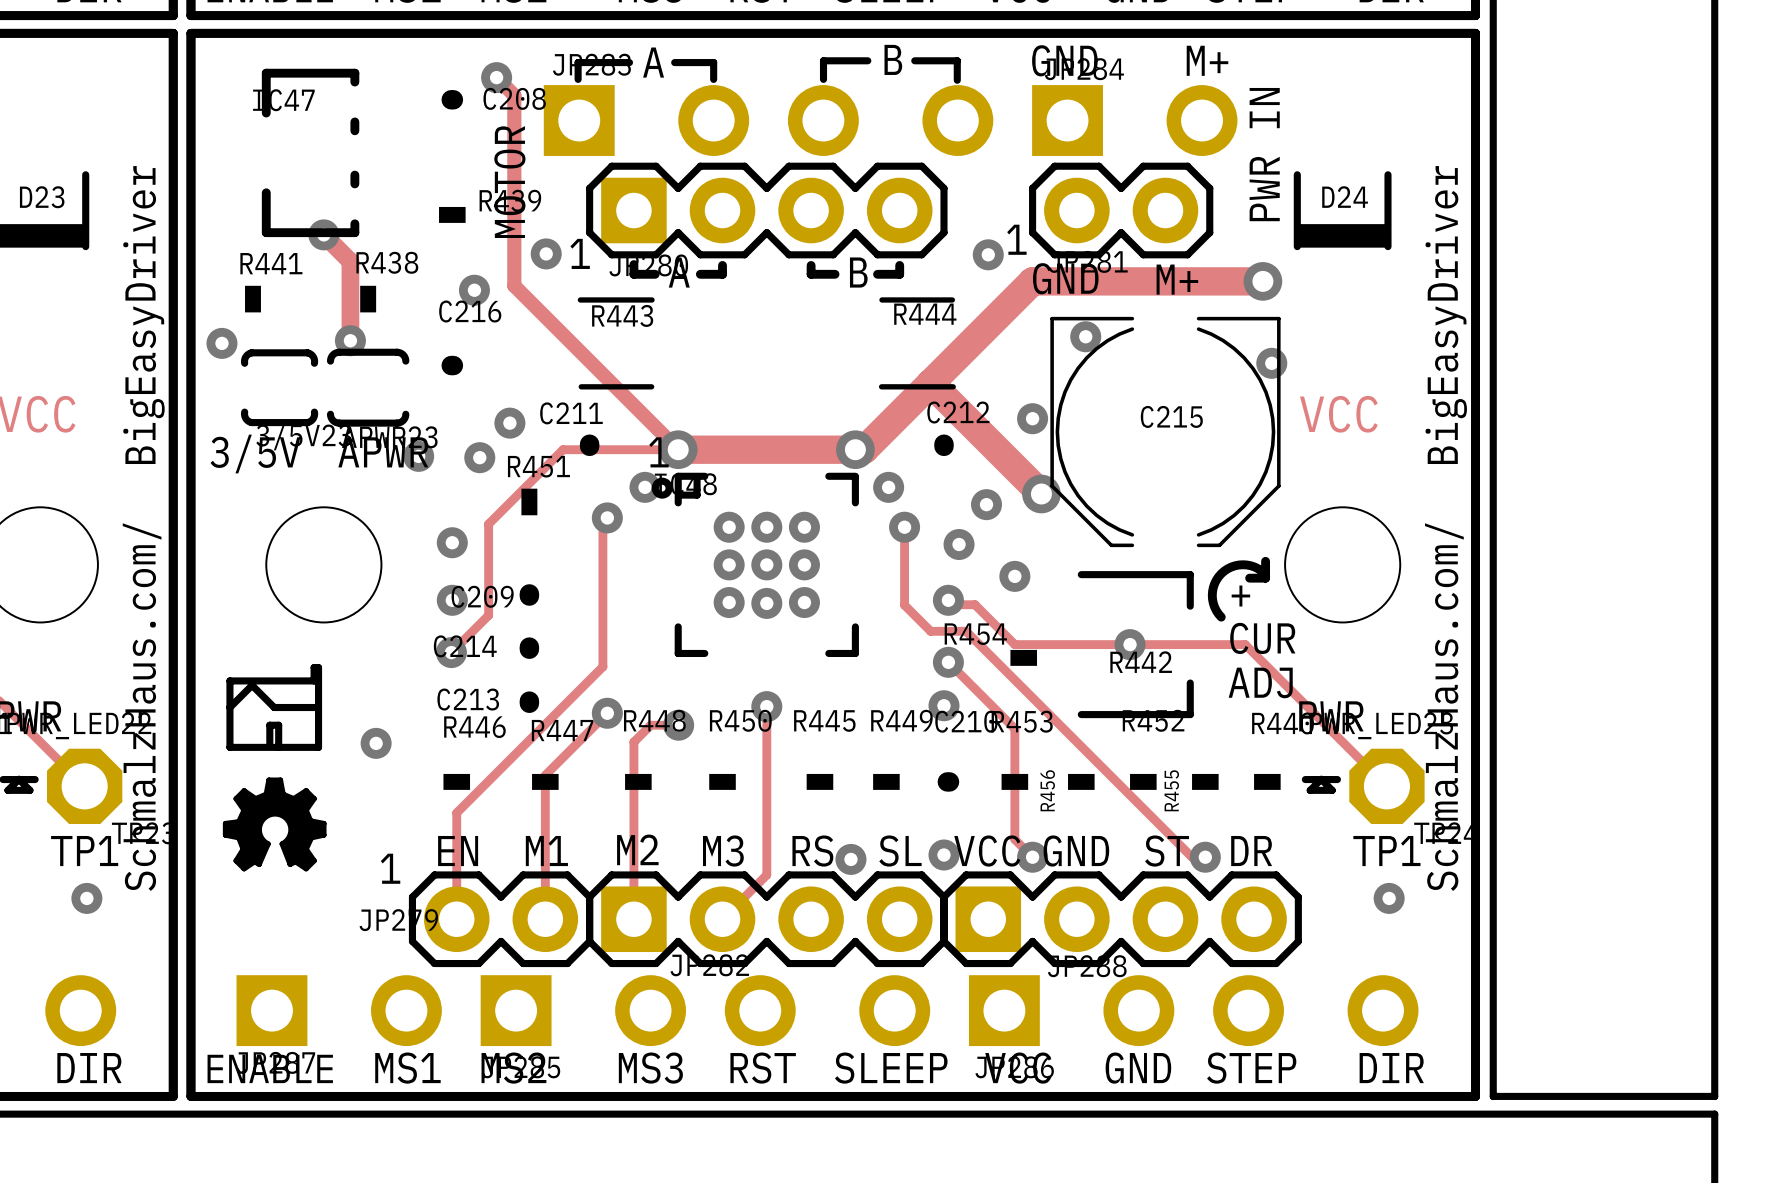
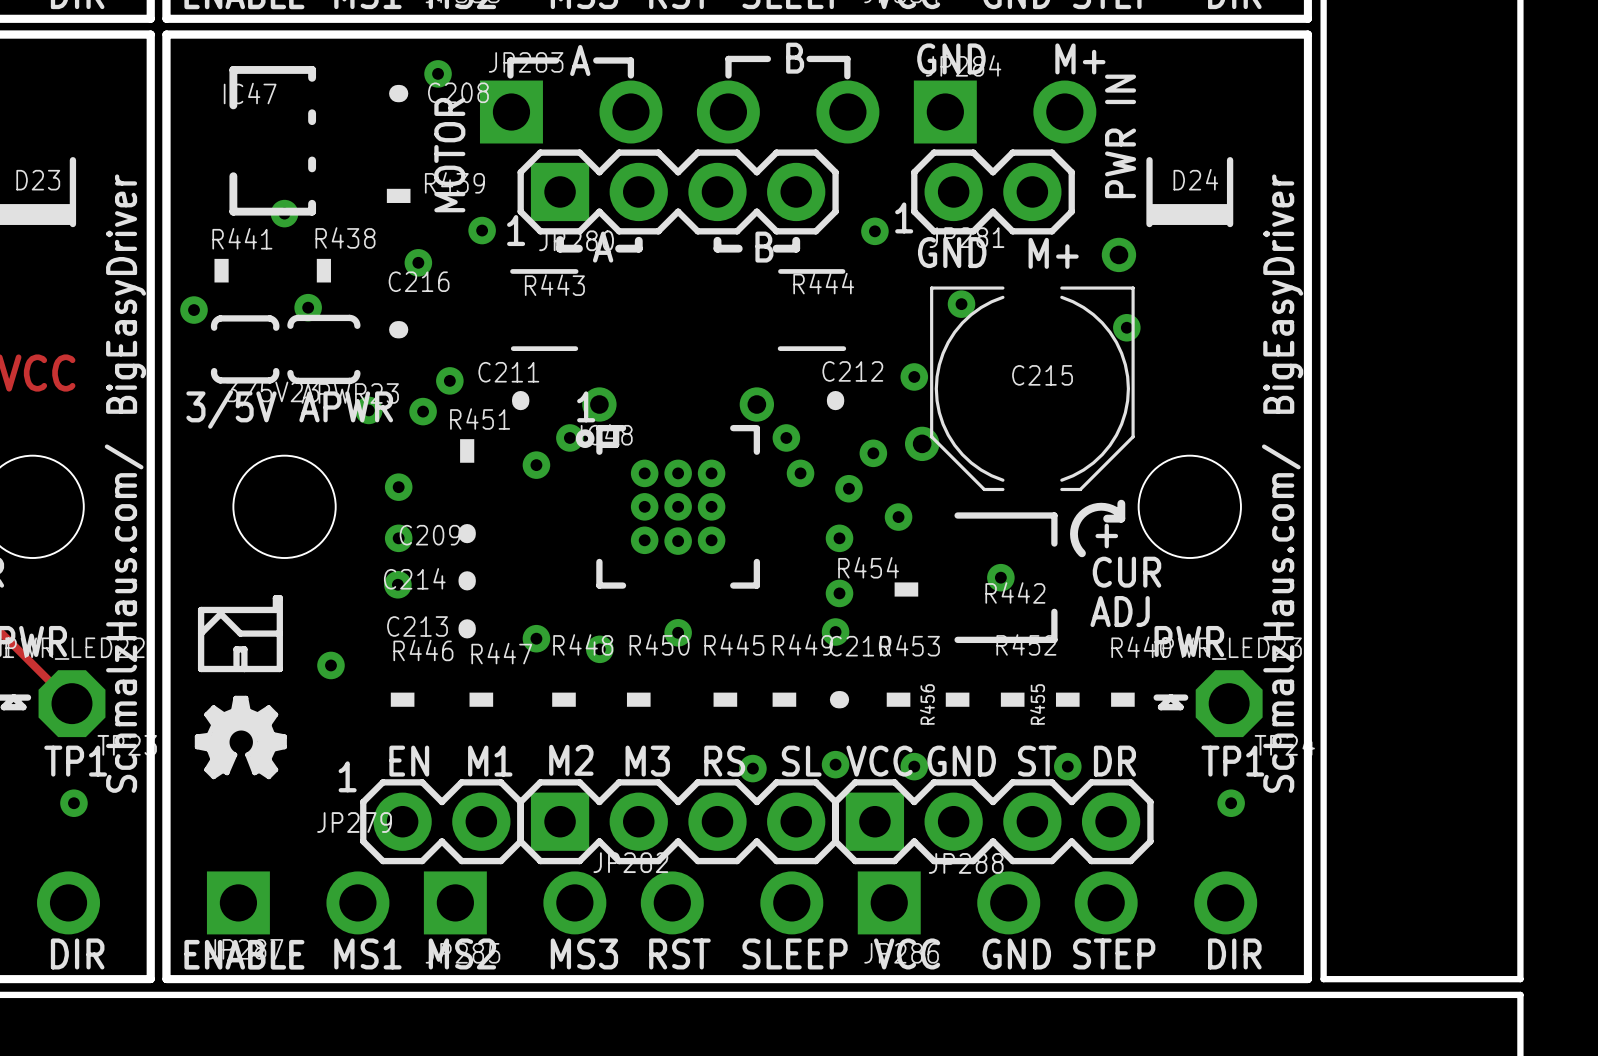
track: (496, 77) (514, 95) (514, 285) (678, 449) -> none
track: (323, 234) (350, 261) (350, 340) -> none
track: (1262, 281) (1032, 281) (864, 449) (678, 449) -> none
track: (930, 383) (1041, 494) -> none
text: VCC (1338, 414) -> none
track: (678, 449) (563, 449) (488, 524) (488, 615) (451, 652) -> none
track: (607, 517) (602, 522) (602, 666) (456, 812) (456, 919) -> none
track: (904, 527) (904, 605) (930, 631) (966, 631) (1192, 857) (1205, 857) -> none
track: (948, 600) (952, 604) (975, 604) (1014, 644) (1245, 644) (1386, 786) -> none
track: (948, 662) (1014, 728) (1014, 839) (1032, 857) -> none
track: (766, 706) (766, 874) (722, 919) -> none
track: (607, 713) (545, 775) (545, 919) -> none
track: (678, 725) (650, 725) (633, 742) (633, 919) -> none

